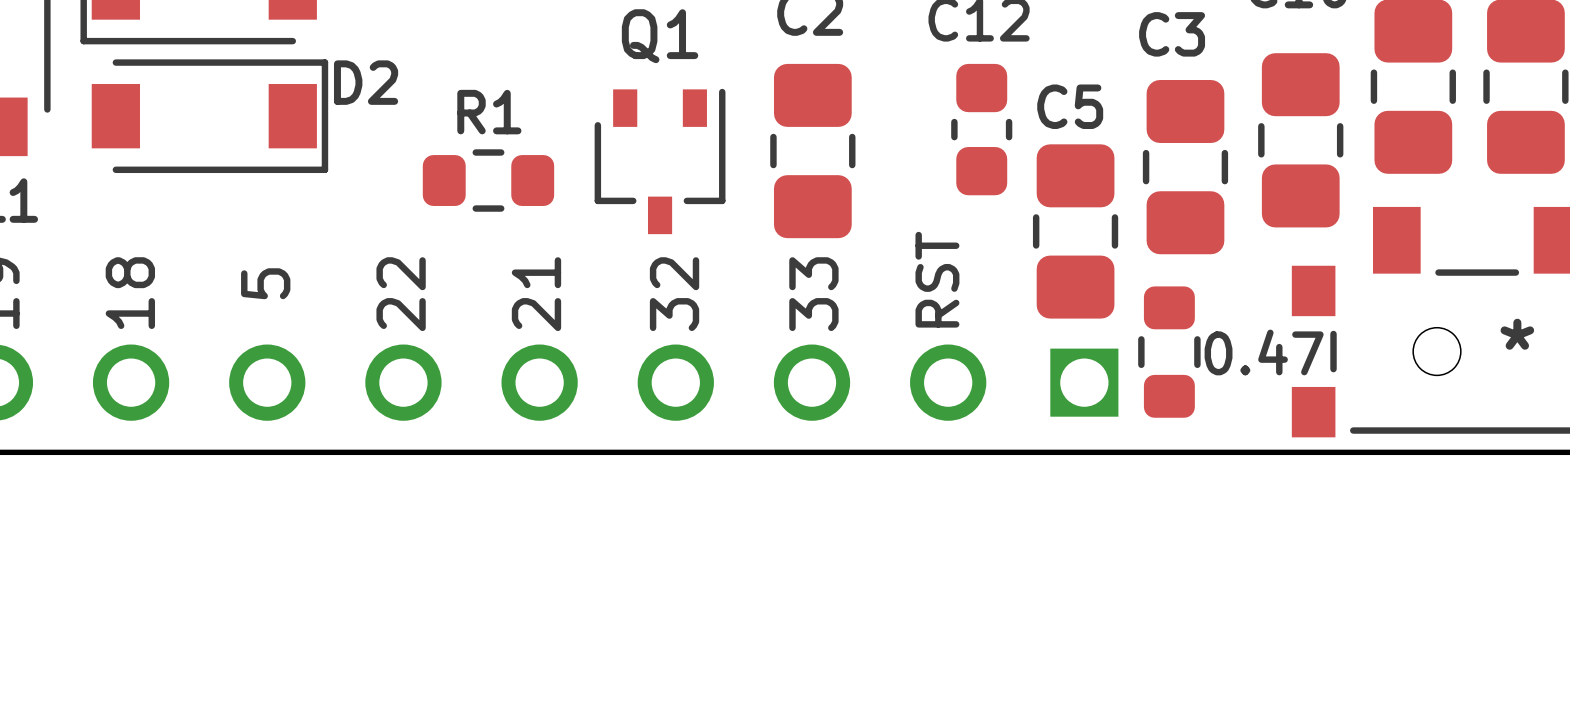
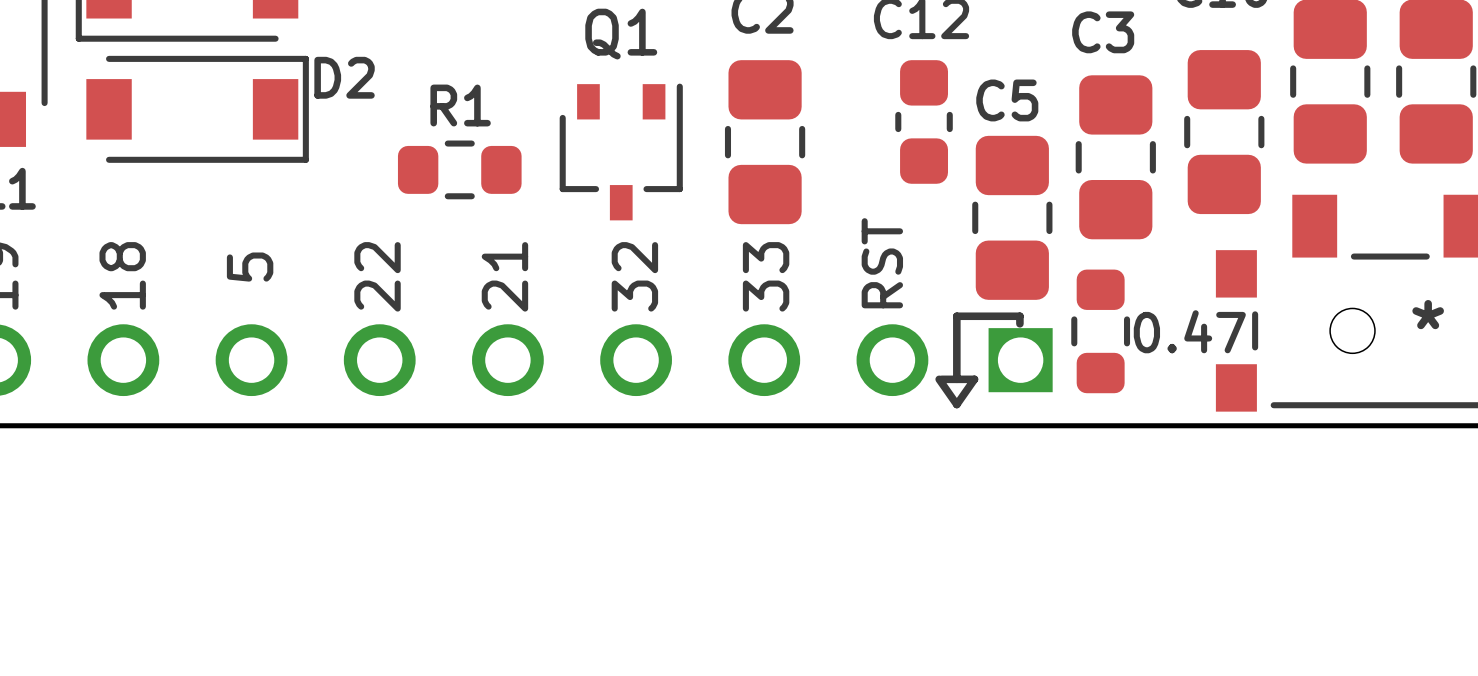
line: none -> (1019, 323) (1019, 316) (956, 316) (956, 379)
line: none -> (939, 379) (956, 404) (974, 379) (941, 379)

